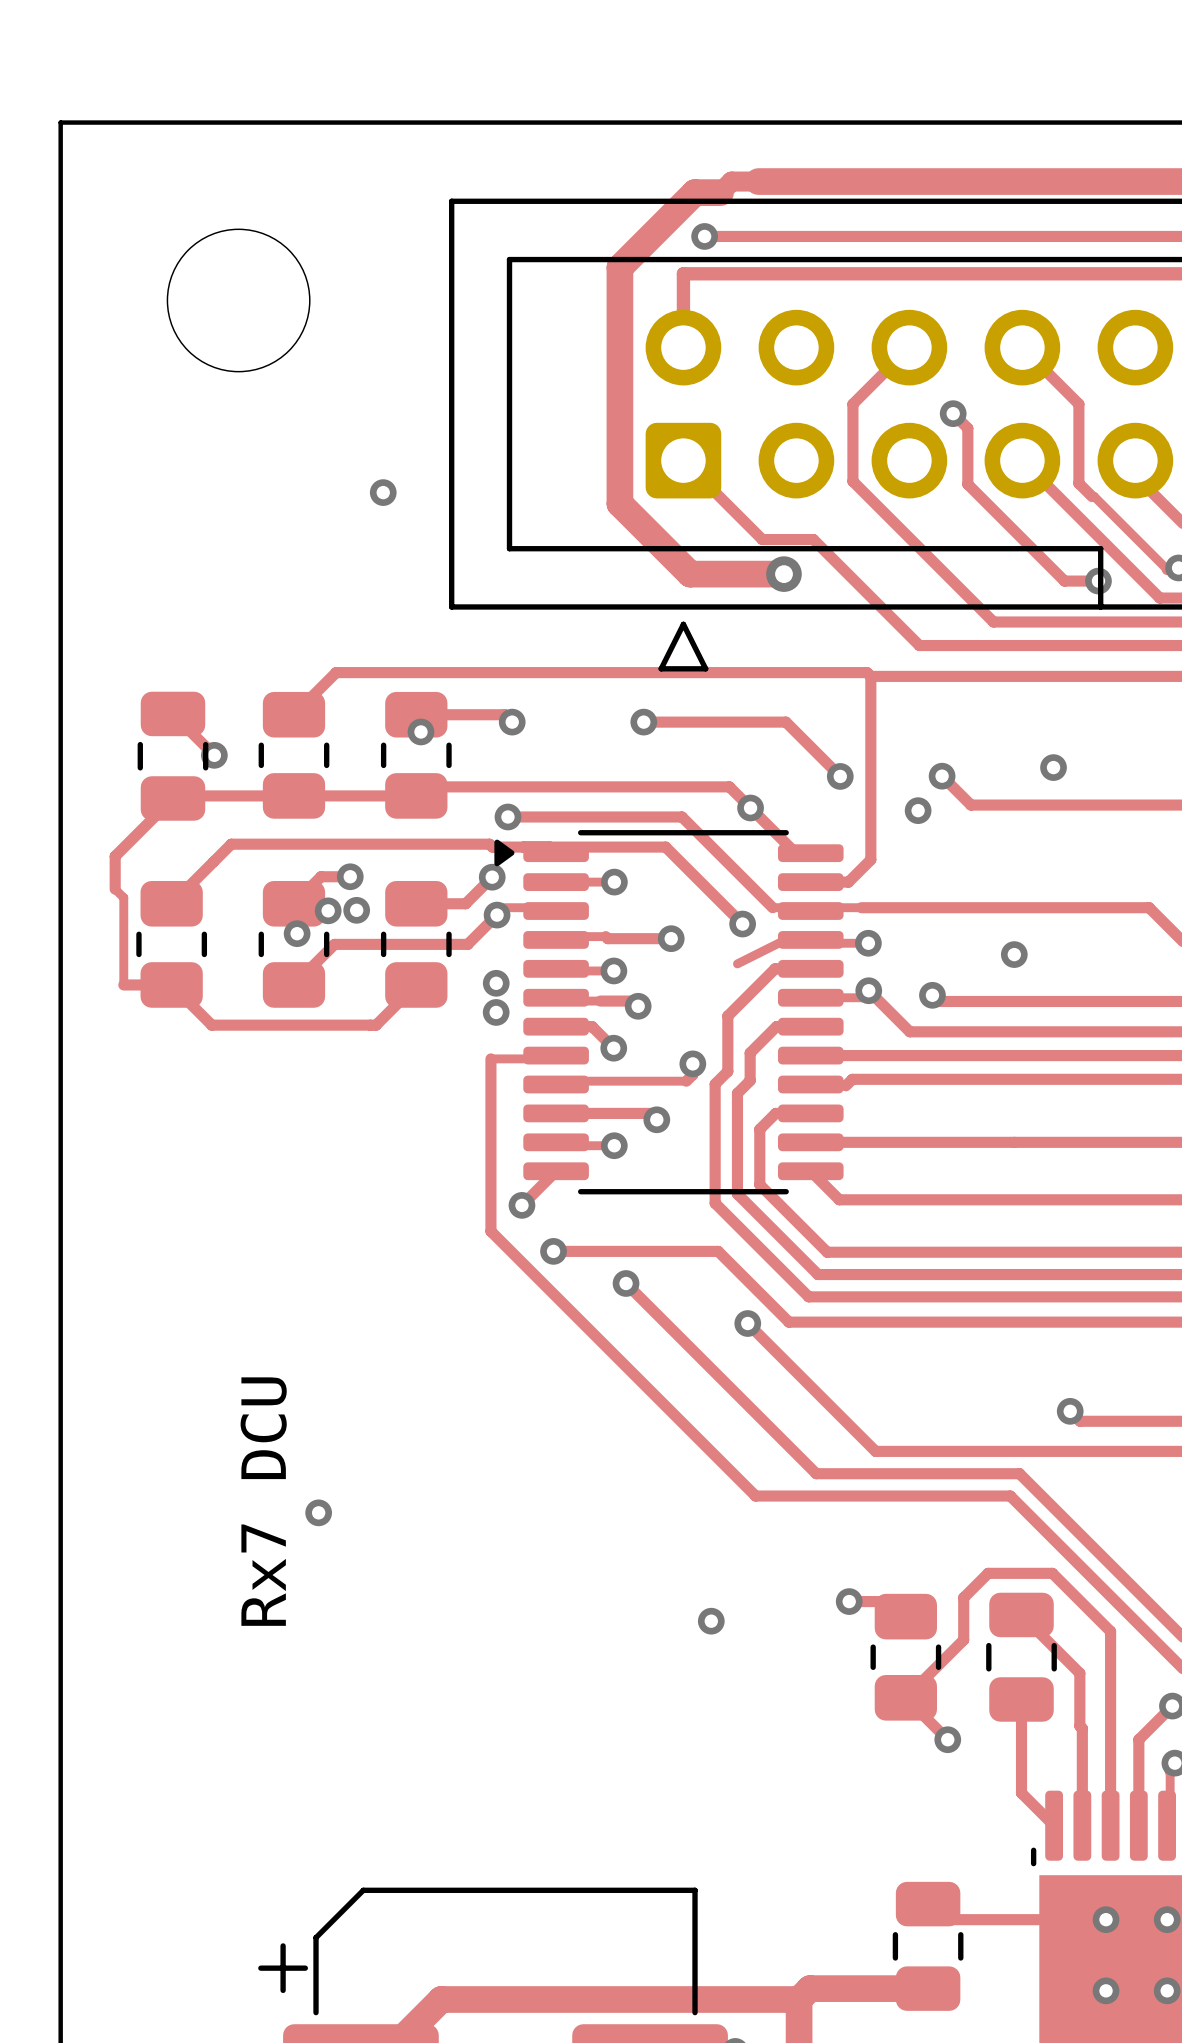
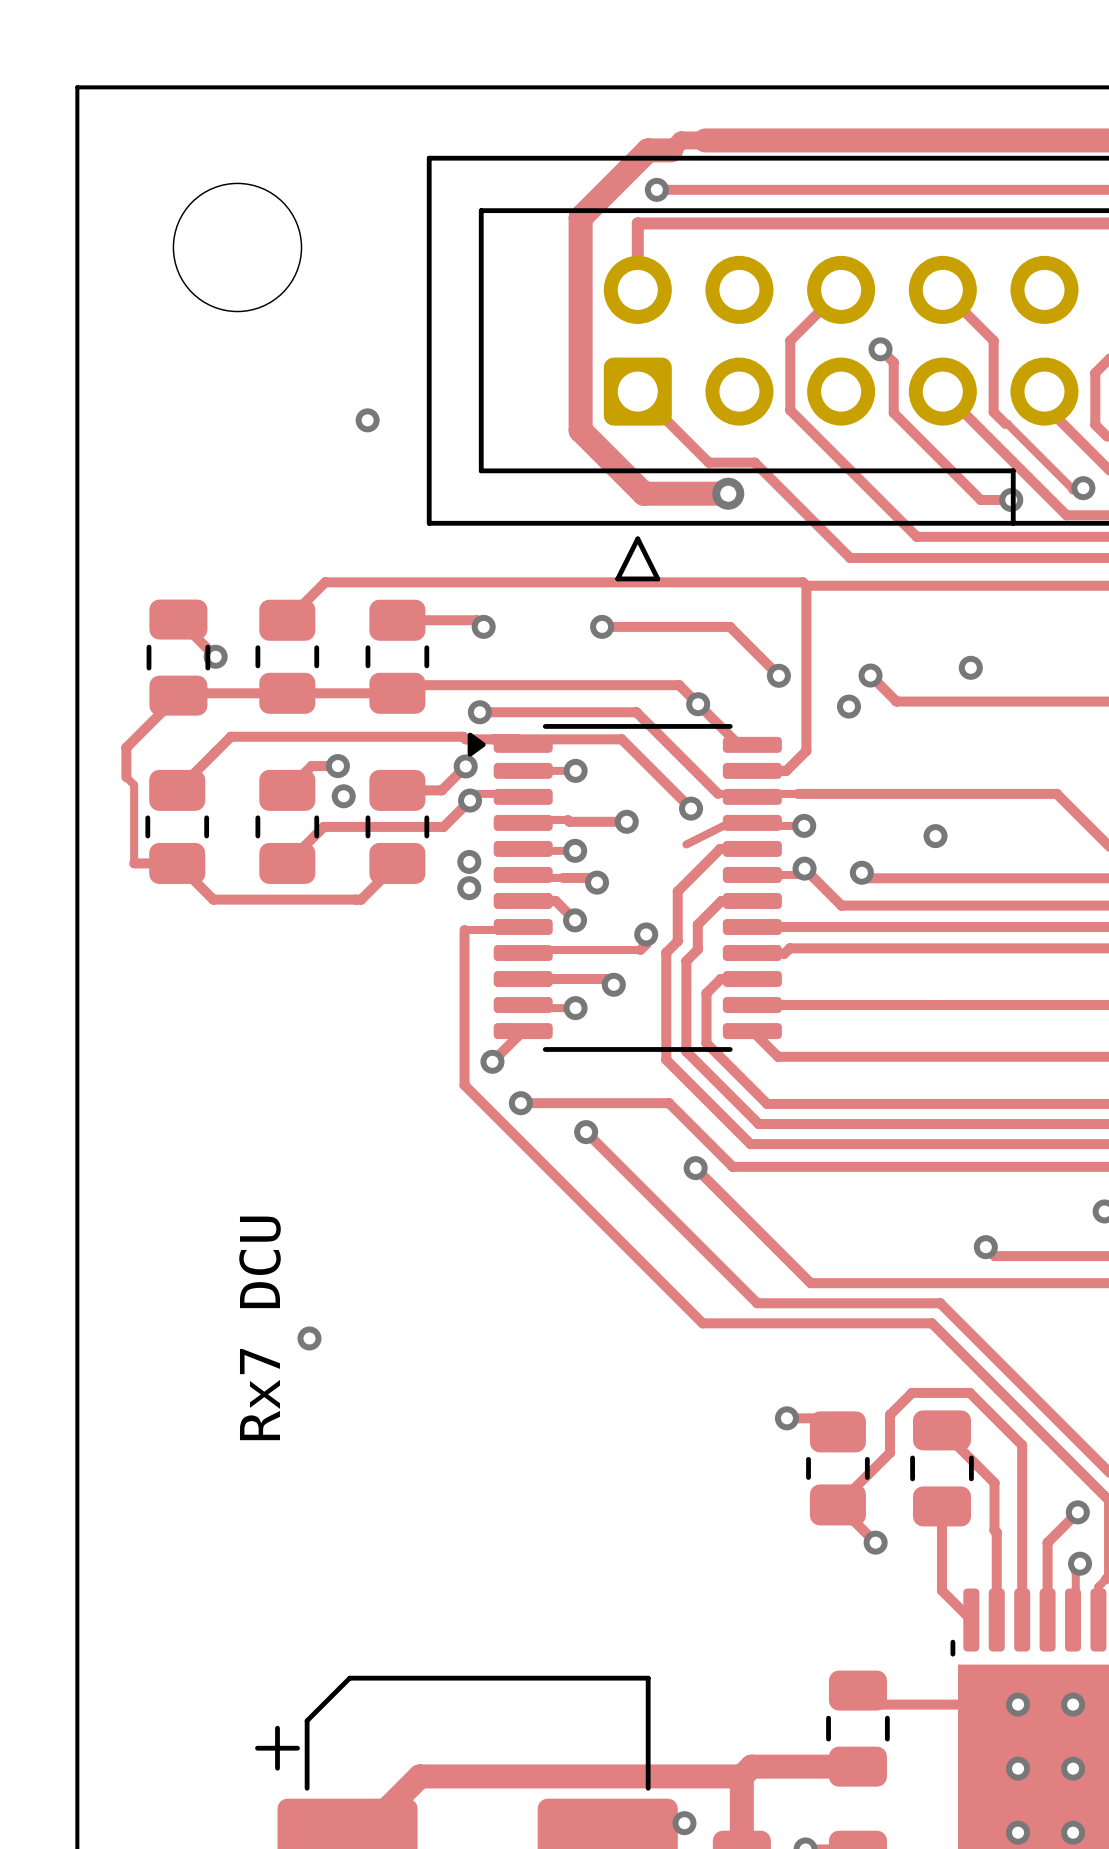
via: (420, 731) -> none
via: (328, 910) -> none
via: (297, 933) -> none
via: (711, 1621) -> none

